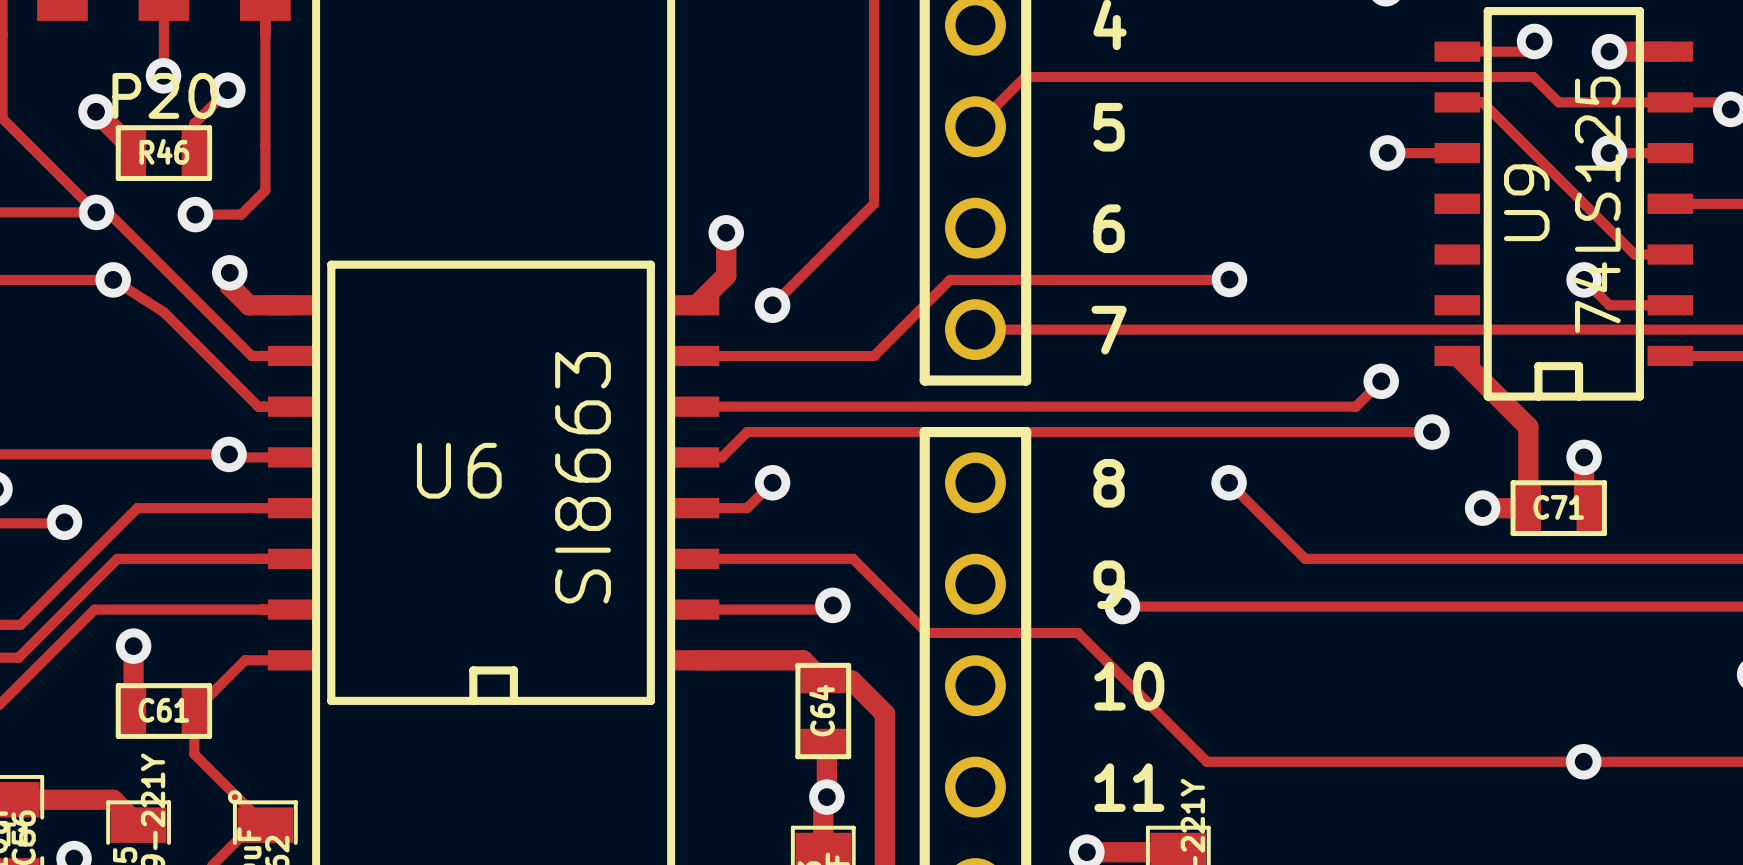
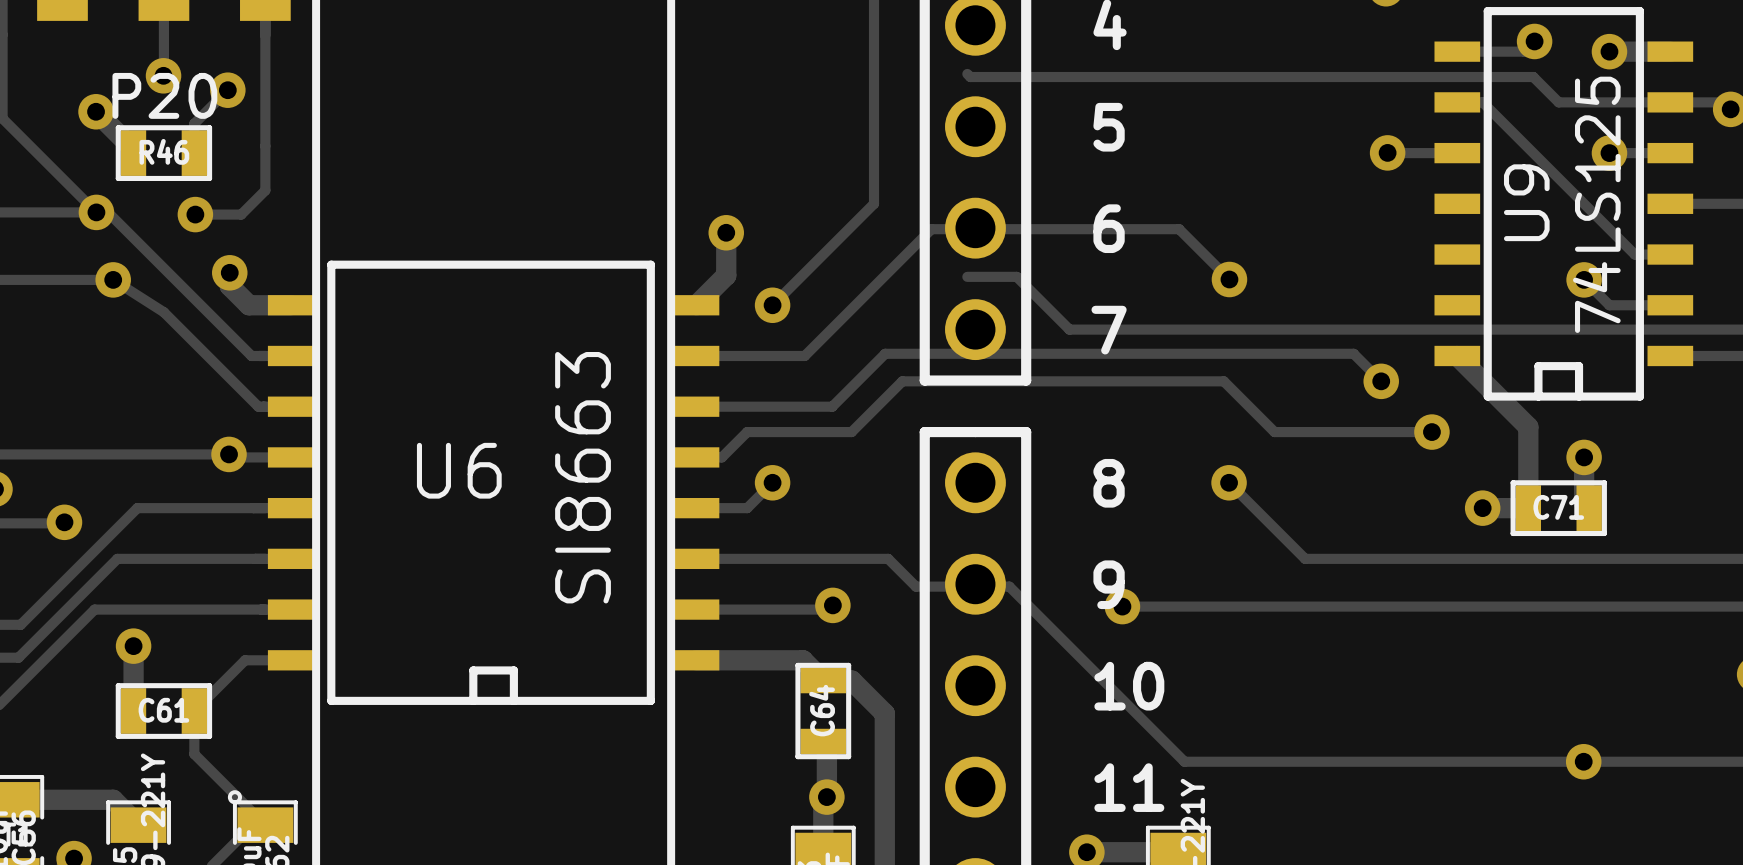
track: (1025, 77) (975, 126) -> (1025, 77) (970, 77) (967, 73)
track: (1229, 279) (950, 279) (874, 355) (804, 355) -> (1229, 279) (1179, 229) (931, 229) (804, 355)
track: (975, 329) (1069, 329) -> (967, 276) (1016, 276) (1069, 329)
track: (1381, 381) (1355, 406) (832, 406) -> (1381, 381) (1353, 353) (885, 353) (832, 406)
track: (851, 432) (1274, 432) -> (851, 432) (902, 381) (1223, 381) (1274, 432)
track: (853, 558) (927, 632) (1078, 632) (1206, 761) -> (853, 558) (888, 558) (915, 586) (1009, 586) (1184, 761) (1206, 761)

